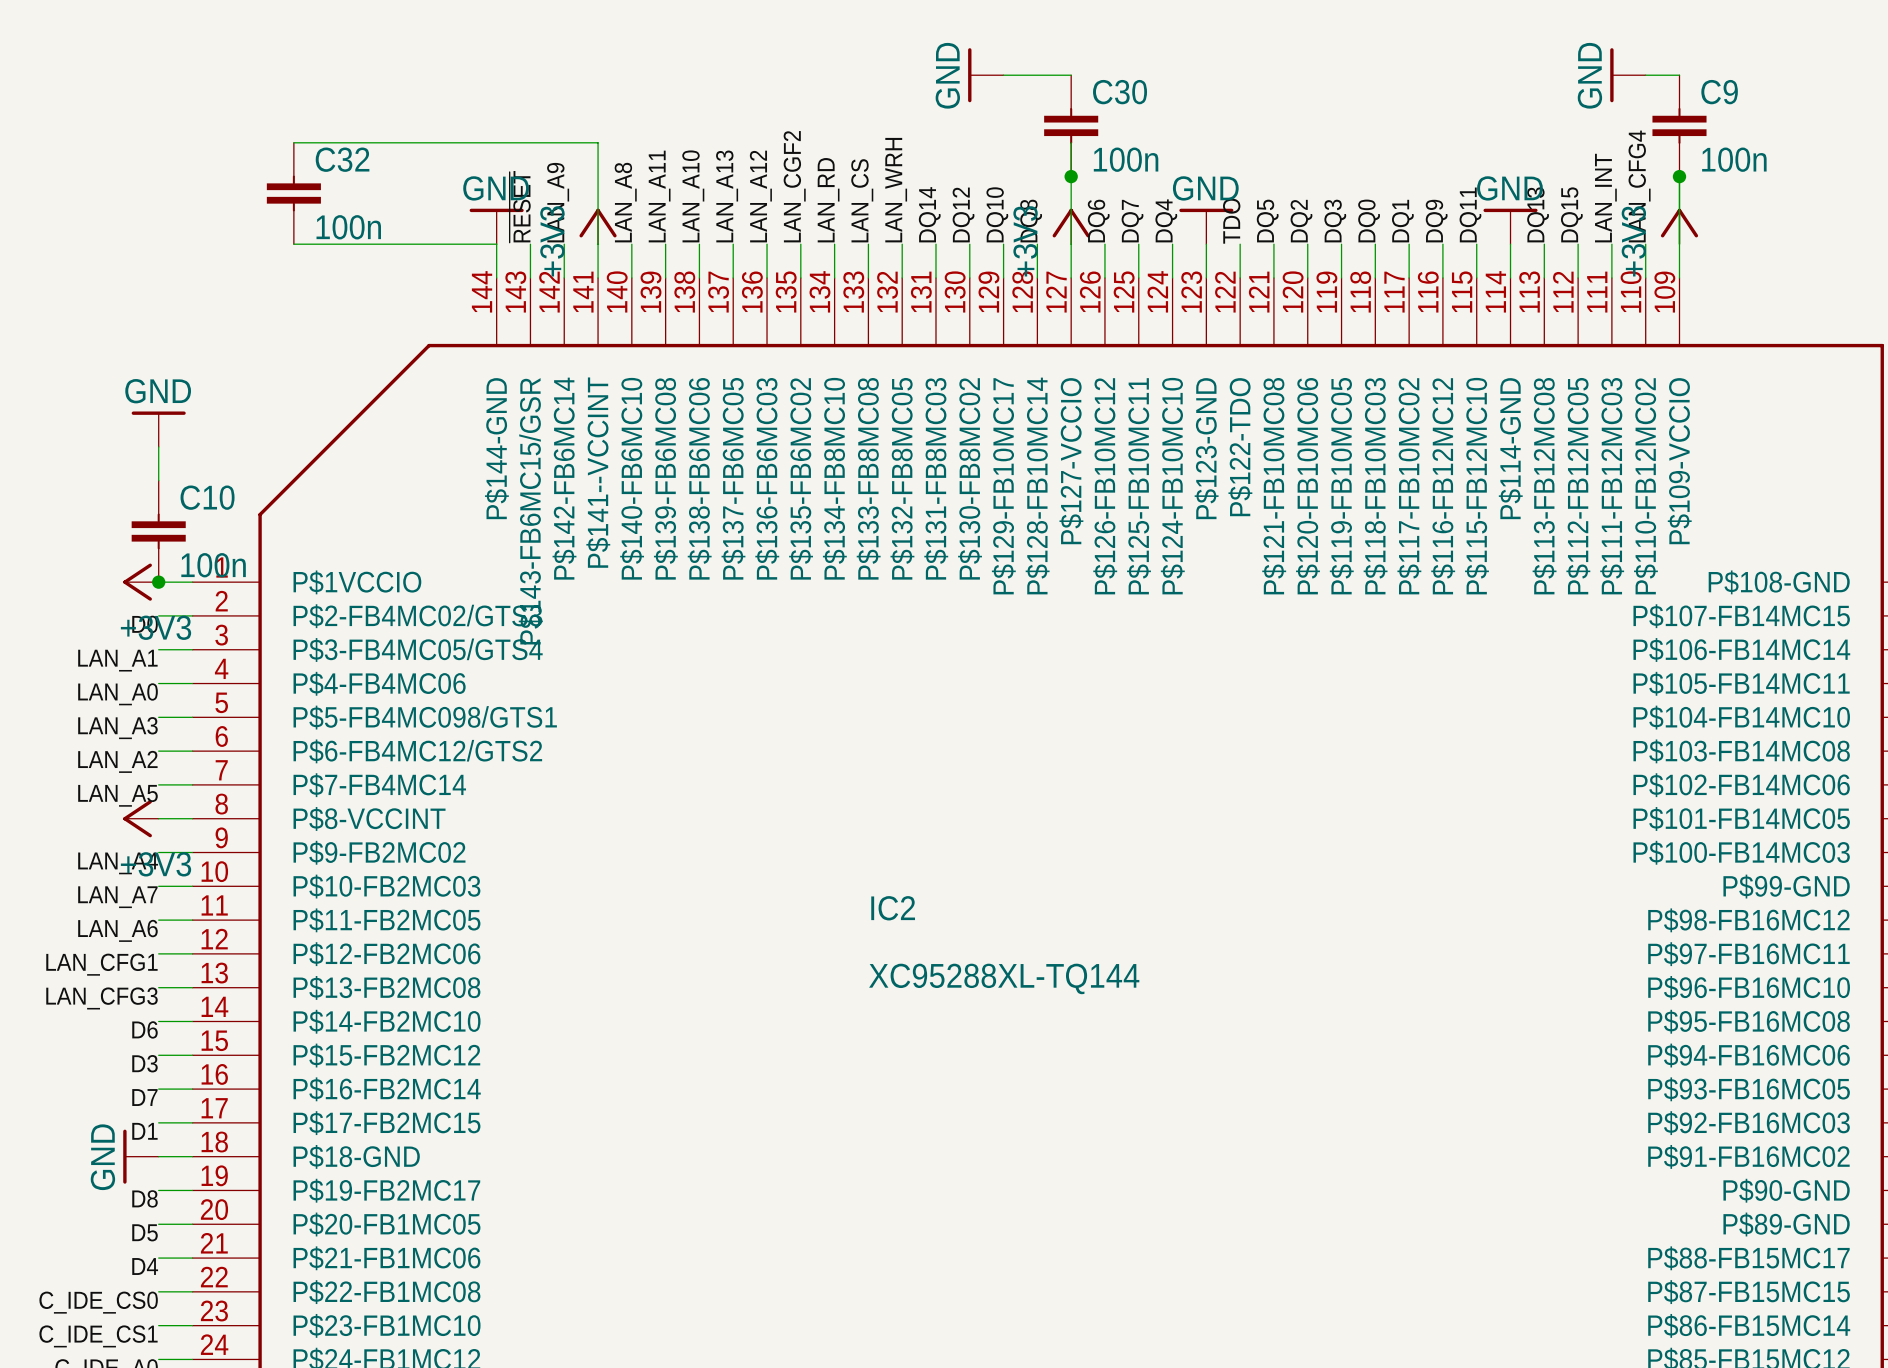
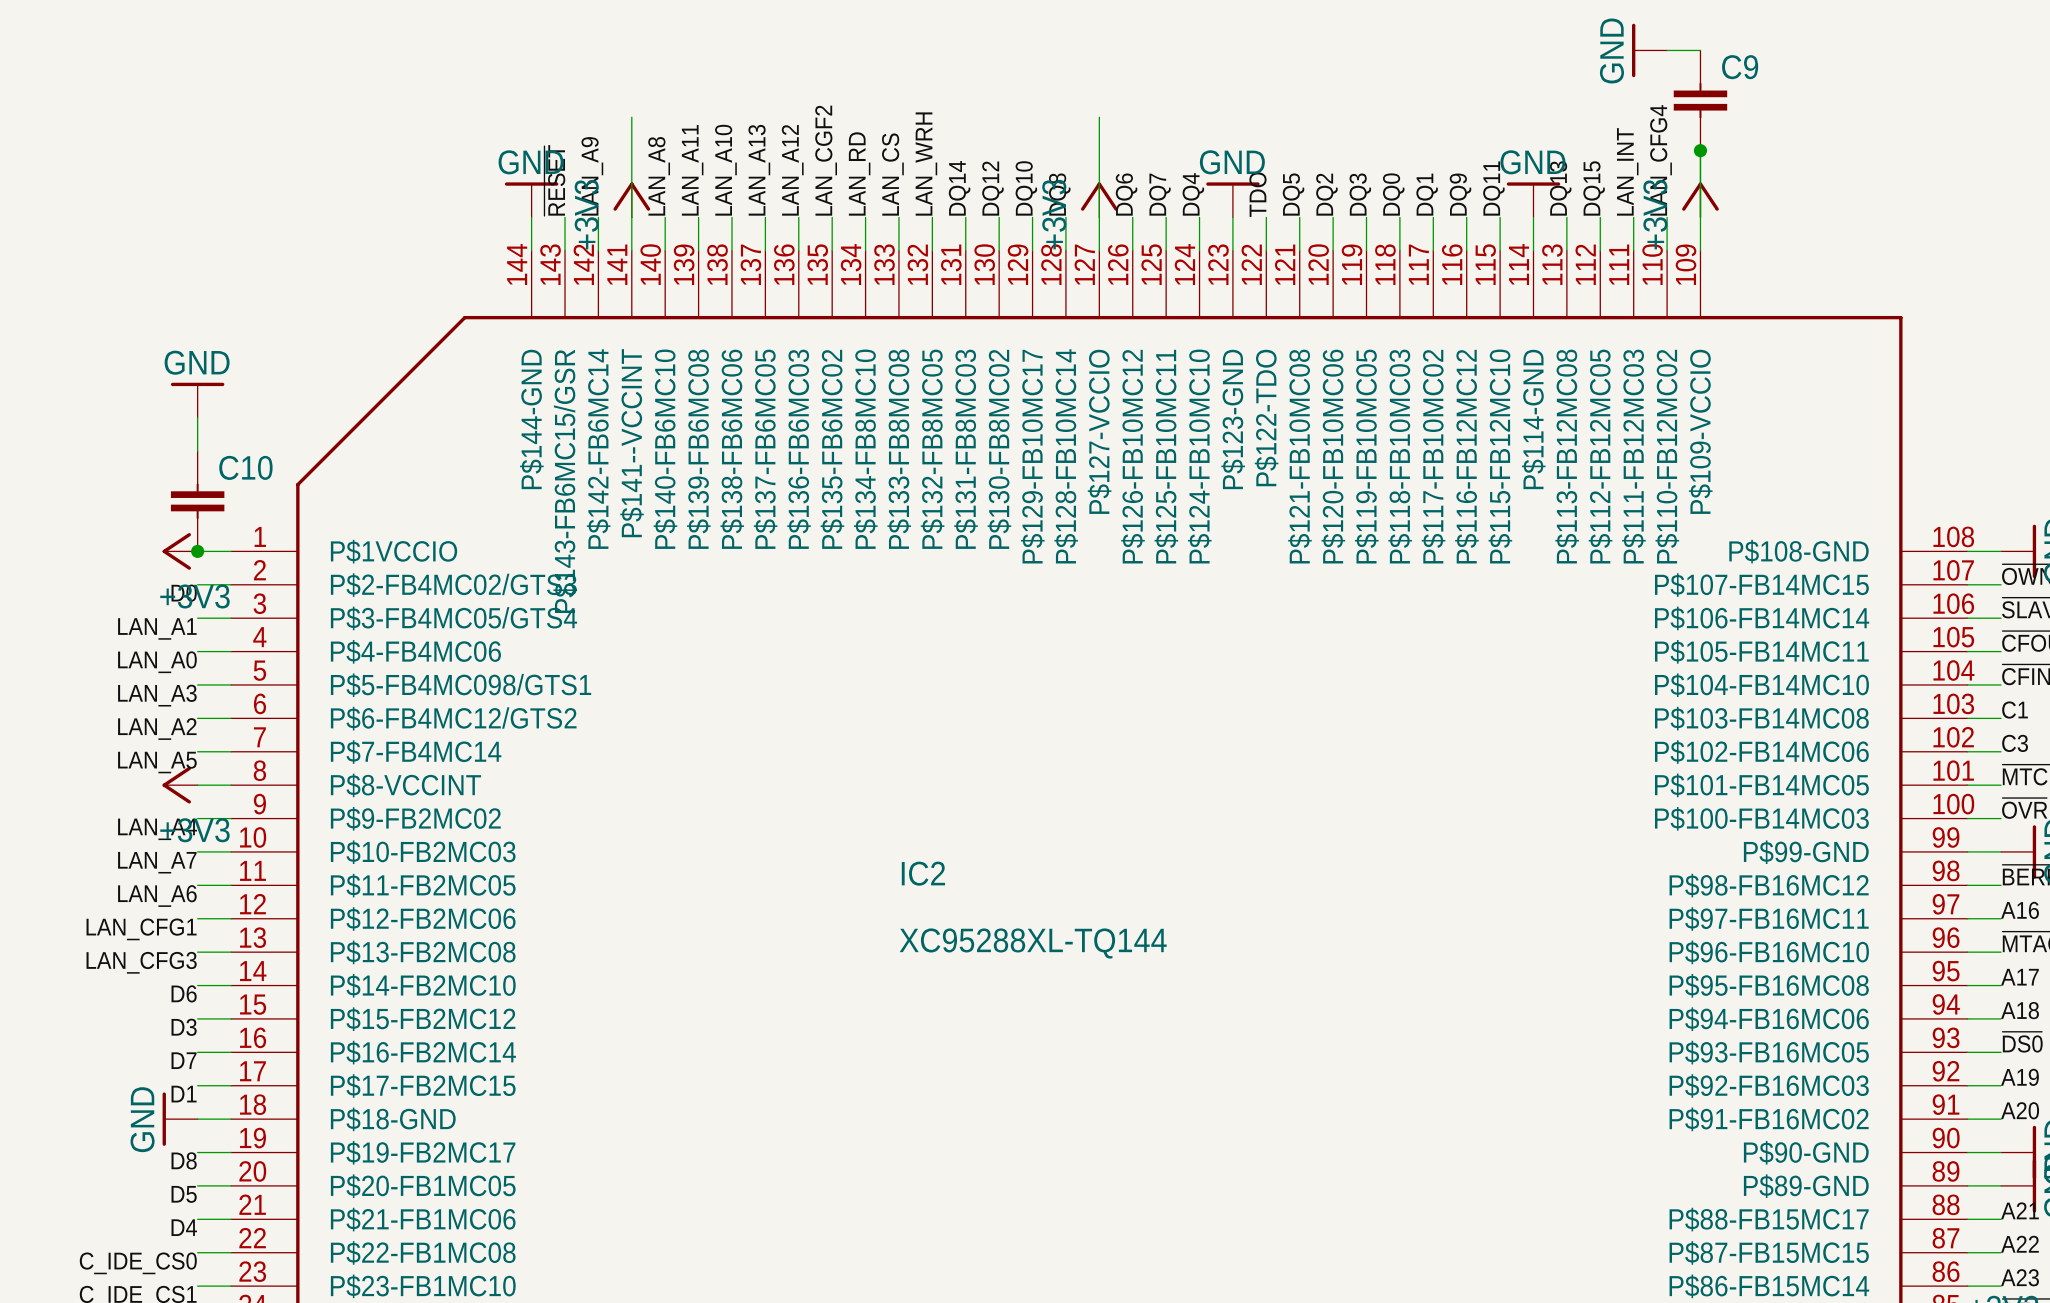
power symbol: GND (985, 75) -> none
wire: (1003, 75) (1071, 75) -> none
C30: 100n (1071, 125) -> none
wire: (293, 142) (598, 142) -> none
C9 value: 100n (1734, 159) -> none
junction: (1071, 176) -> none
C32: 100n (293, 193) -> none
wire: (293, 244) (496, 244) -> none
C10 value: 100n (213, 565) -> none

